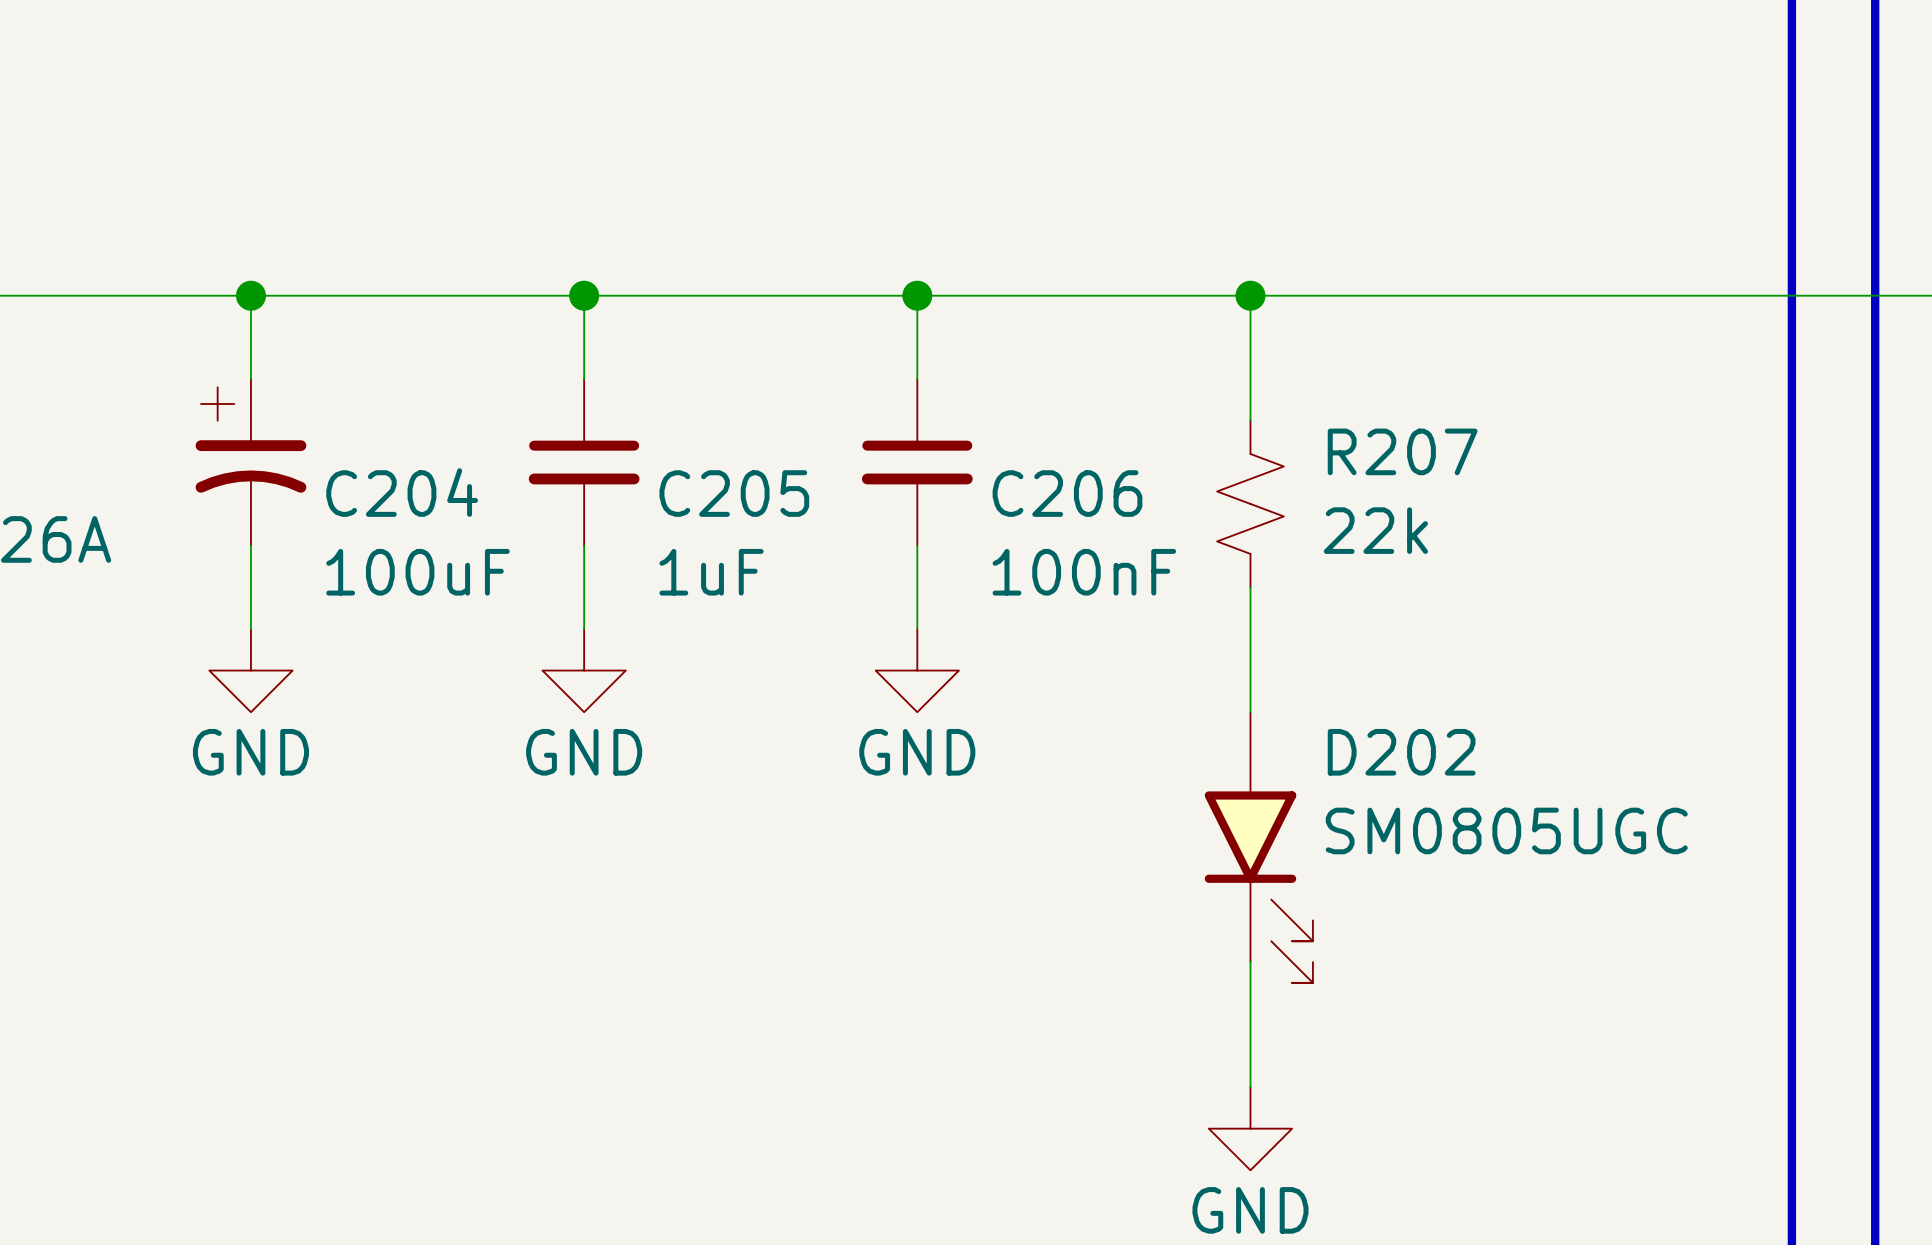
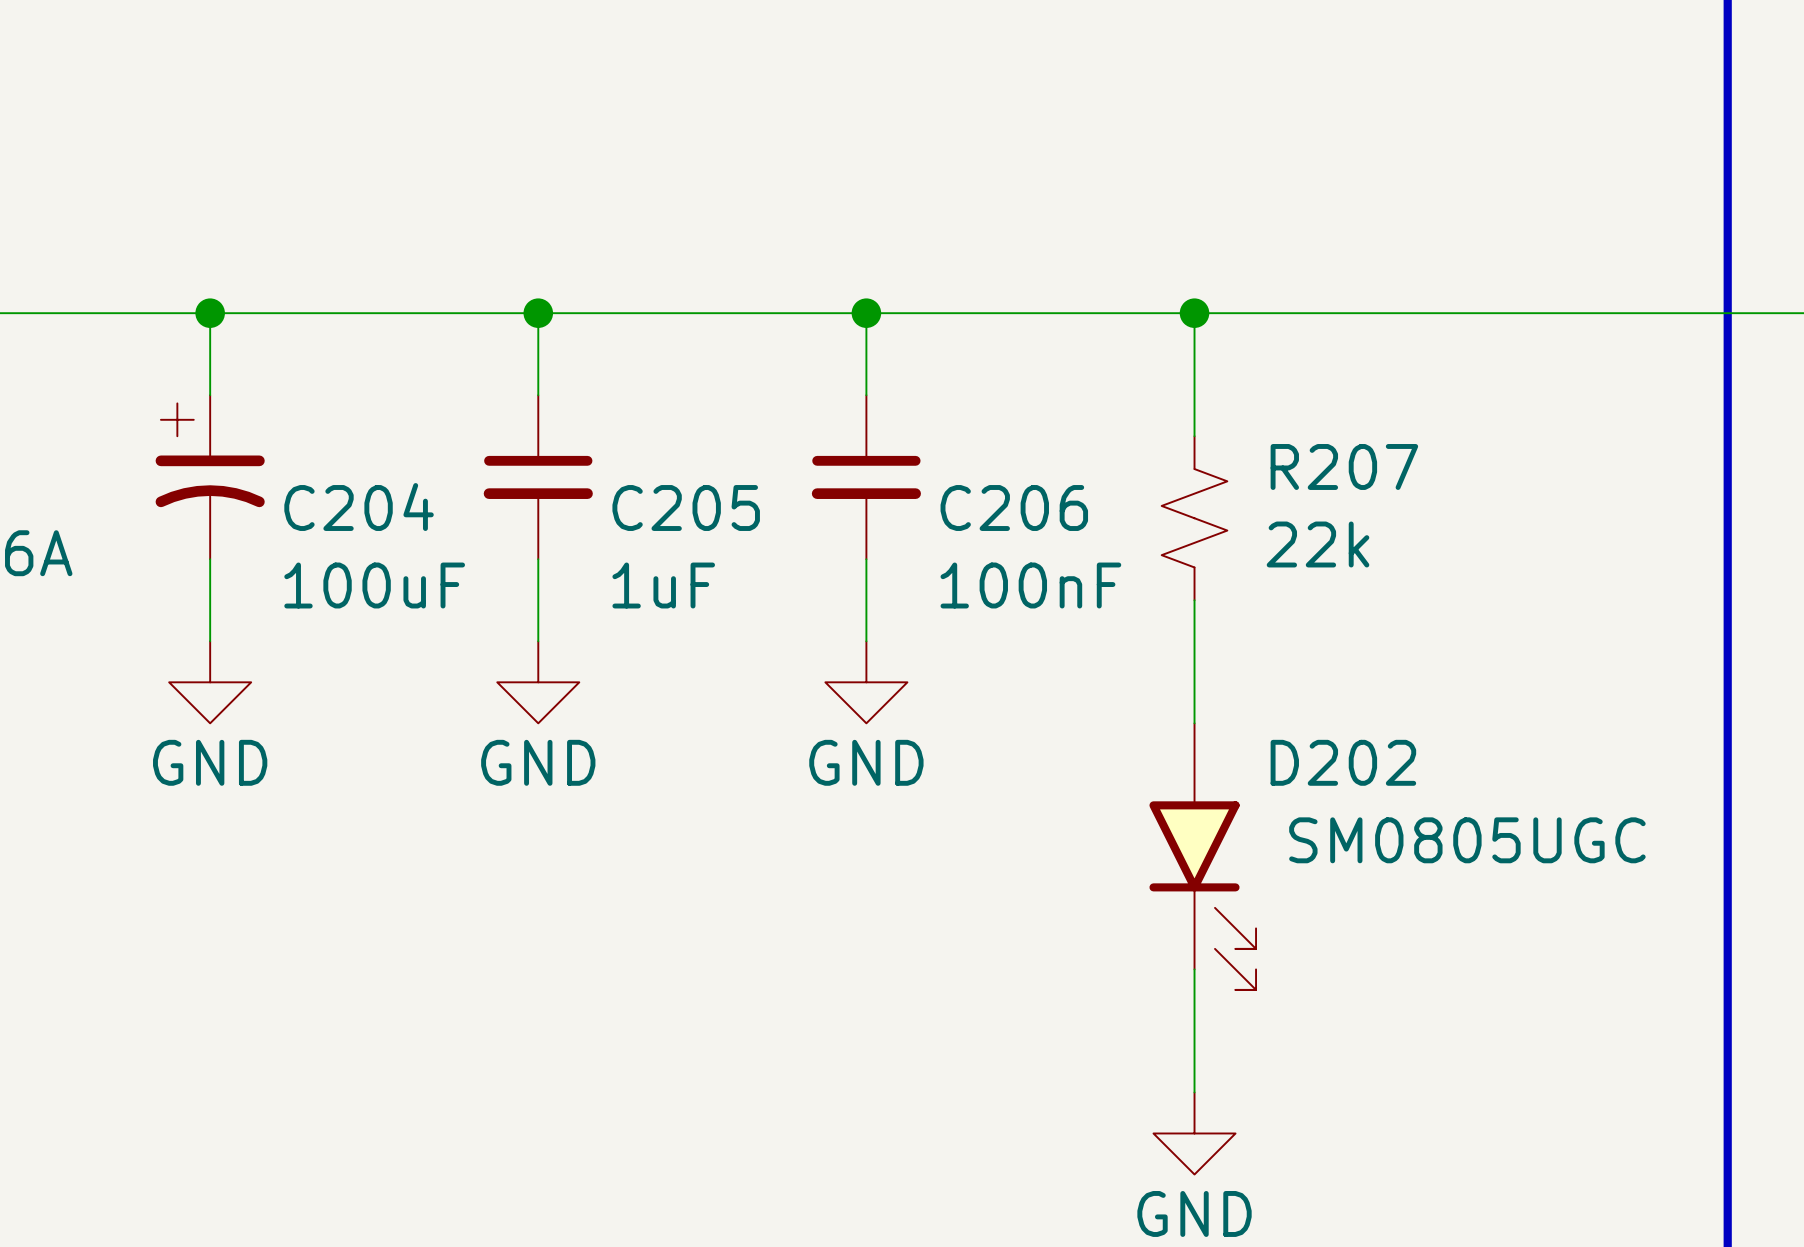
D202 value position: SM0805UGC (1506, 830) -> SM0805UGC (1467, 840)

